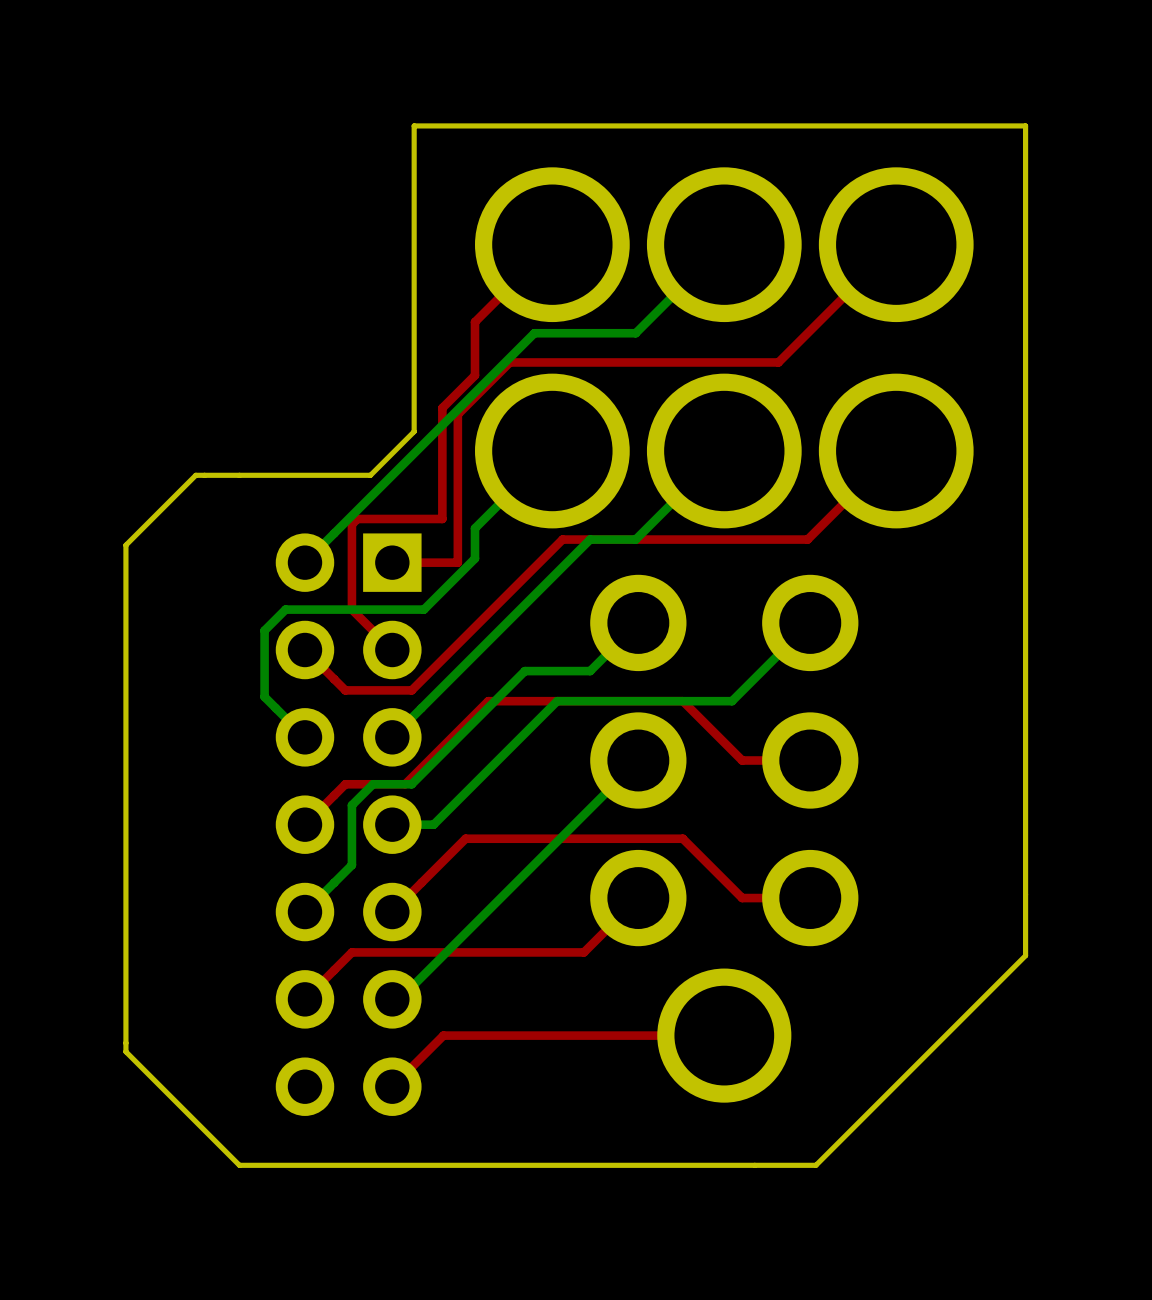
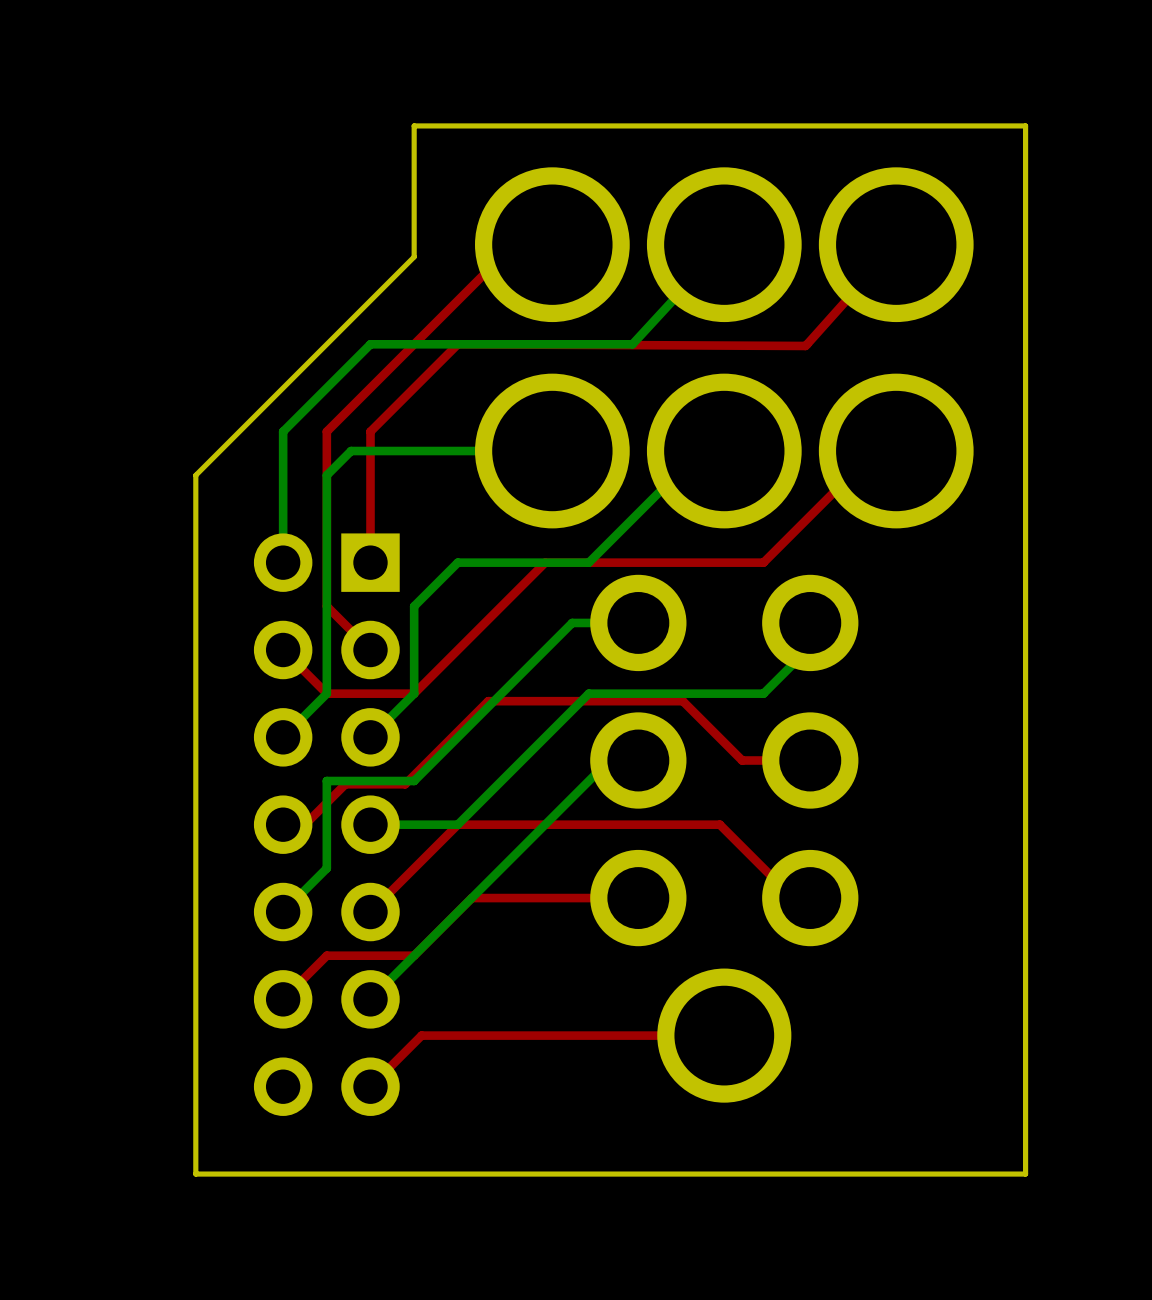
top track: (552, 244) (474, 322) (474, 375) (442, 408) (442, 518) (357, 518) (351, 524) (351, 609) (392, 649) -> (552, 244) (513, 244) (326, 431) (326, 606) (370, 649)
bottom track: (724, 244) (635, 333) (534, 333) (304, 562) -> (724, 244) (632, 344) (370, 344) (283, 431) (283, 562)
top track: (896, 244) (778, 362) (509, 362) (457, 414) (457, 562) (370, 562) -> (896, 244) (805, 345) (457, 344) (370, 431) (370, 562)
board edge: (414, 256) (414, 431) (370, 475) (195, 475) (125, 545) (125, 1051) (239, 1165) (815, 1165) (1025, 955) -> (414, 256) (195, 475) (195, 1174) (1025, 1174) (1025, 955)
bottom track: (552, 451) (474, 528) (474, 558) (423, 609) (285, 609) (264, 630) (264, 696) (304, 737) -> (552, 451) (351, 451) (326, 475) (326, 693) (283, 737)
bottom track: (724, 451) (635, 539) (590, 539) (392, 737) -> (724, 451) (700, 451) (588, 562) (457, 562) (414, 606) (414, 693) (370, 737)
top track: (896, 451) (807, 539) (562, 539) (411, 690) (345, 690) (304, 649) -> (896, 451) (875, 451) (763, 562) (545, 562) (414, 693) (326, 693) (283, 649)
bottom track: (638, 622) (590, 671) (524, 671) (411, 784) (372, 784) (351, 805) (351, 865) (304, 912) -> (638, 622) (572, 622) (414, 781) (326, 781) (326, 868) (283, 912)
bottom track: (810, 622) (732, 701) (557, 701) (433, 824) -> (810, 622) (810, 646) (763, 693) (588, 693) (457, 824) (433, 824)
bottom track: (638, 760) (399, 999) (392, 999) -> (638, 760) (609, 760) (370, 999)
part position: (348, 824) -> (326, 824)
top track: (638, 898) (583, 952) (351, 952) (304, 999) -> (638, 898) (471, 898) (414, 955) (326, 955) (283, 999)
top track: (793, 898) (742, 898) (682, 838) (465, 838) (392, 912) -> (793, 898) (719, 824) (457, 824) (370, 912)
top track: (443, 1035) (392, 1086) -> (443, 1035) (421, 1035) (370, 1086)

